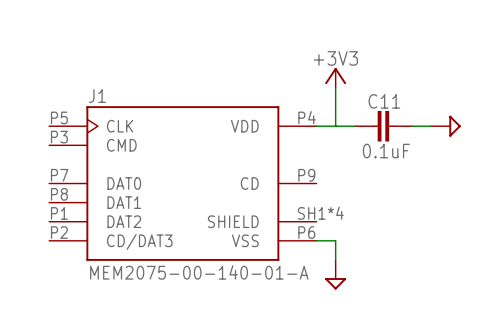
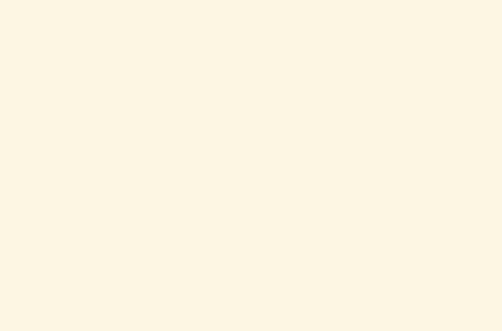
power symbol: +3V3 (335, 77) -> none
wire: (335, 88) (335, 126) -> none
wire: (316, 126) (354, 126) -> none
C11: 0.1uF (383, 126) -> none
wire: (412, 126) (431, 126) -> none
power symbol: (445, 126) -> none
J1: MEM2075-00-140-01-A (182, 183) -> none
wire: (316, 240) (335, 240) (335, 259) -> none
power symbol: (335, 274) -> none

